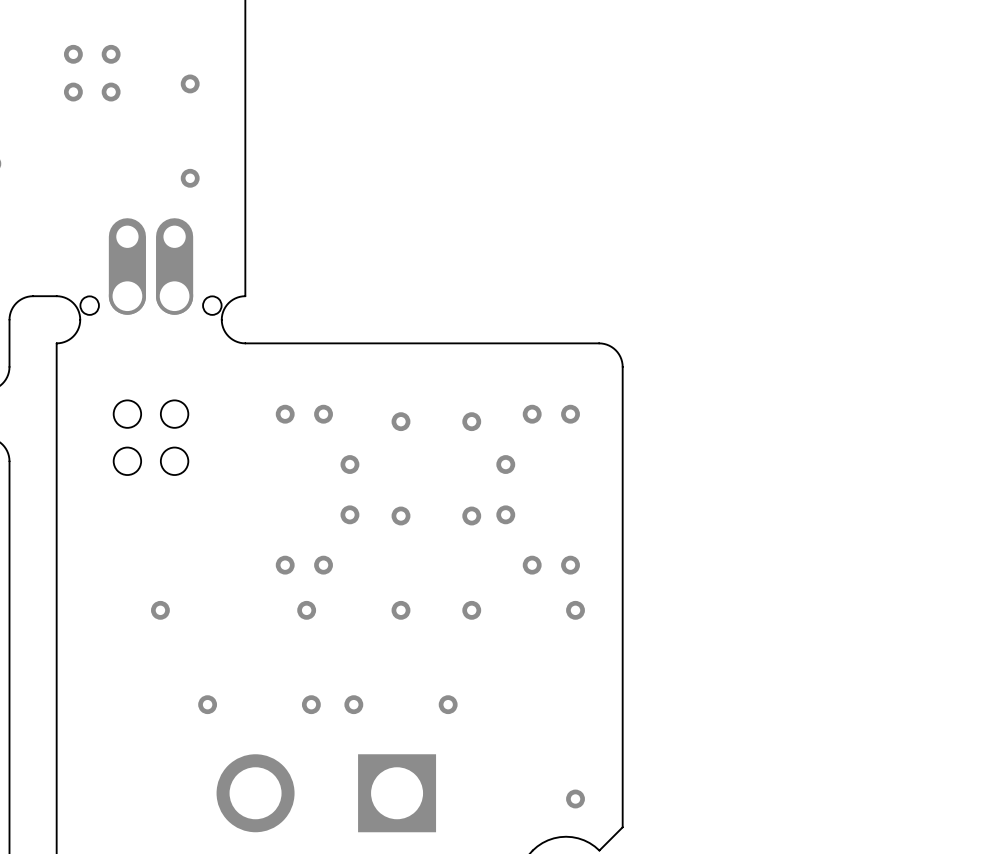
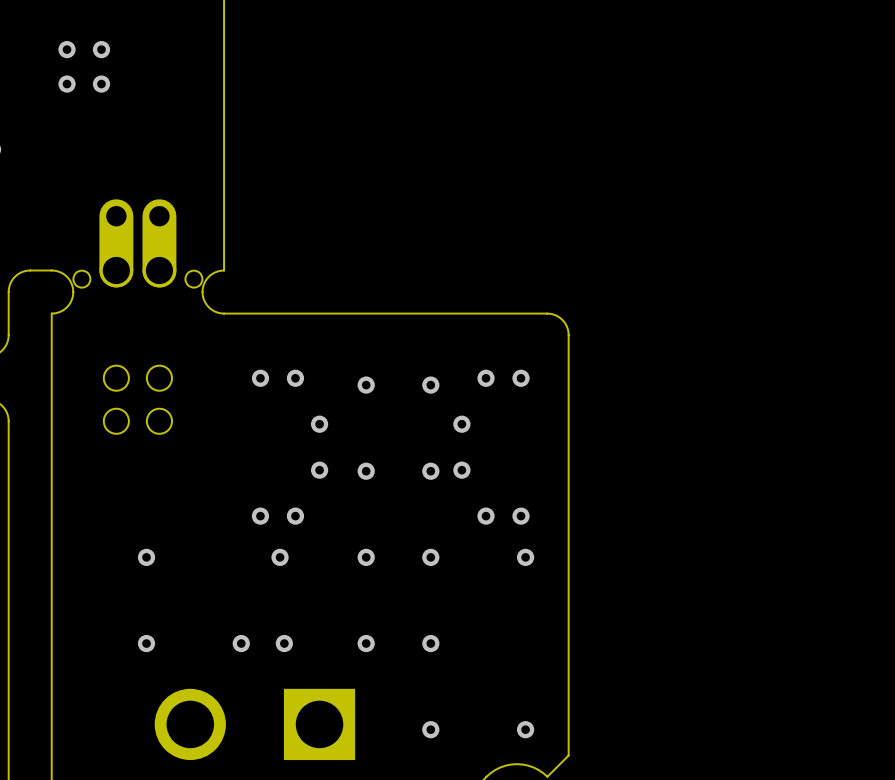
via: (190, 83) -> none
via: (190, 178) -> none
via: none -> (146, 643)
via: (207, 704) -> none
via: none -> (241, 643)
via: (353, 704) -> none
via: none -> (366, 643)
via: (448, 704) -> none
via: none -> (430, 643)
part position: (326, 793) -> (254, 724)
via: none -> (430, 729)

